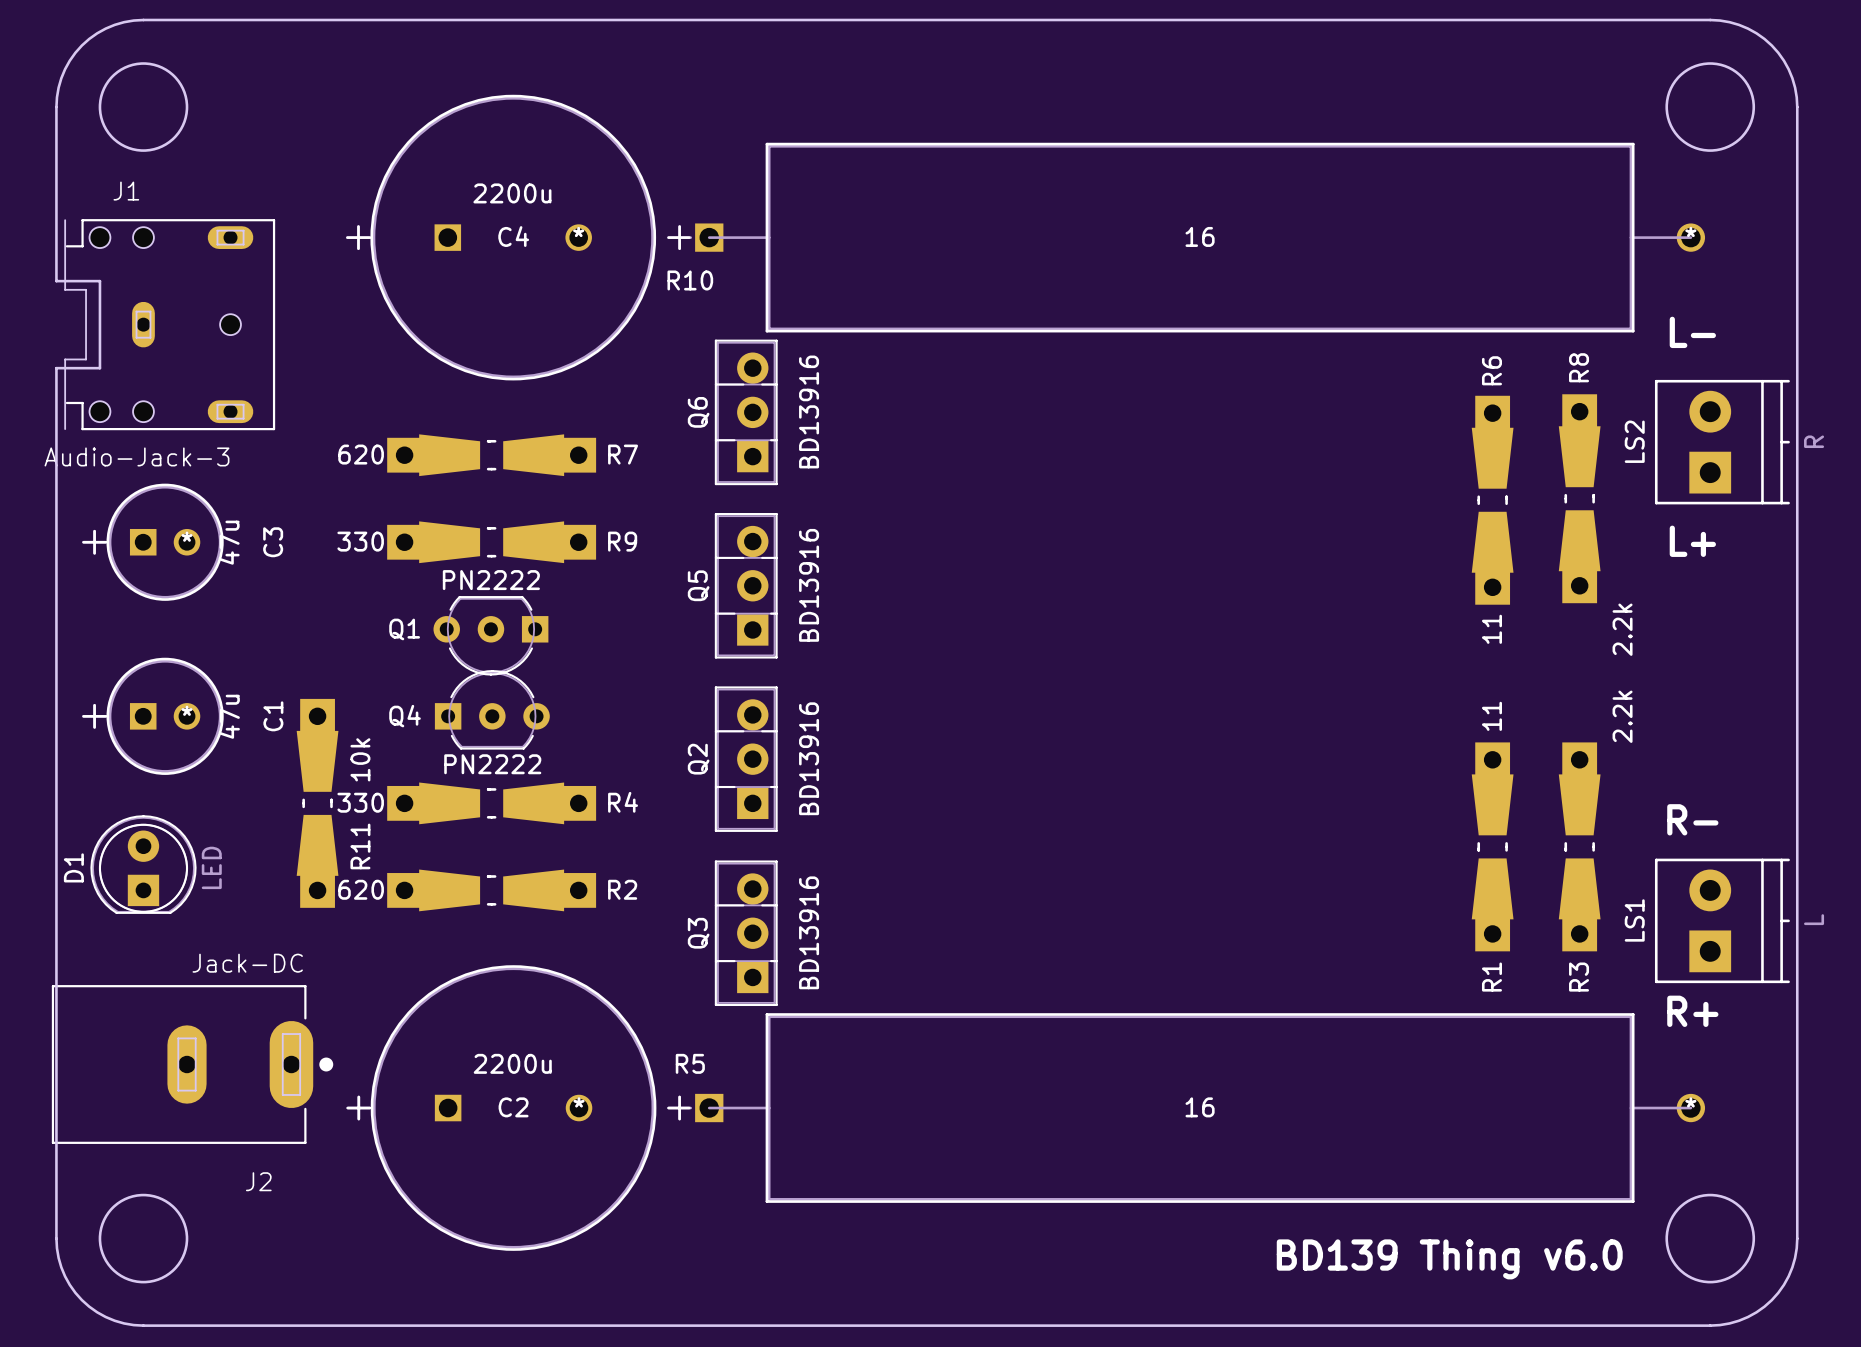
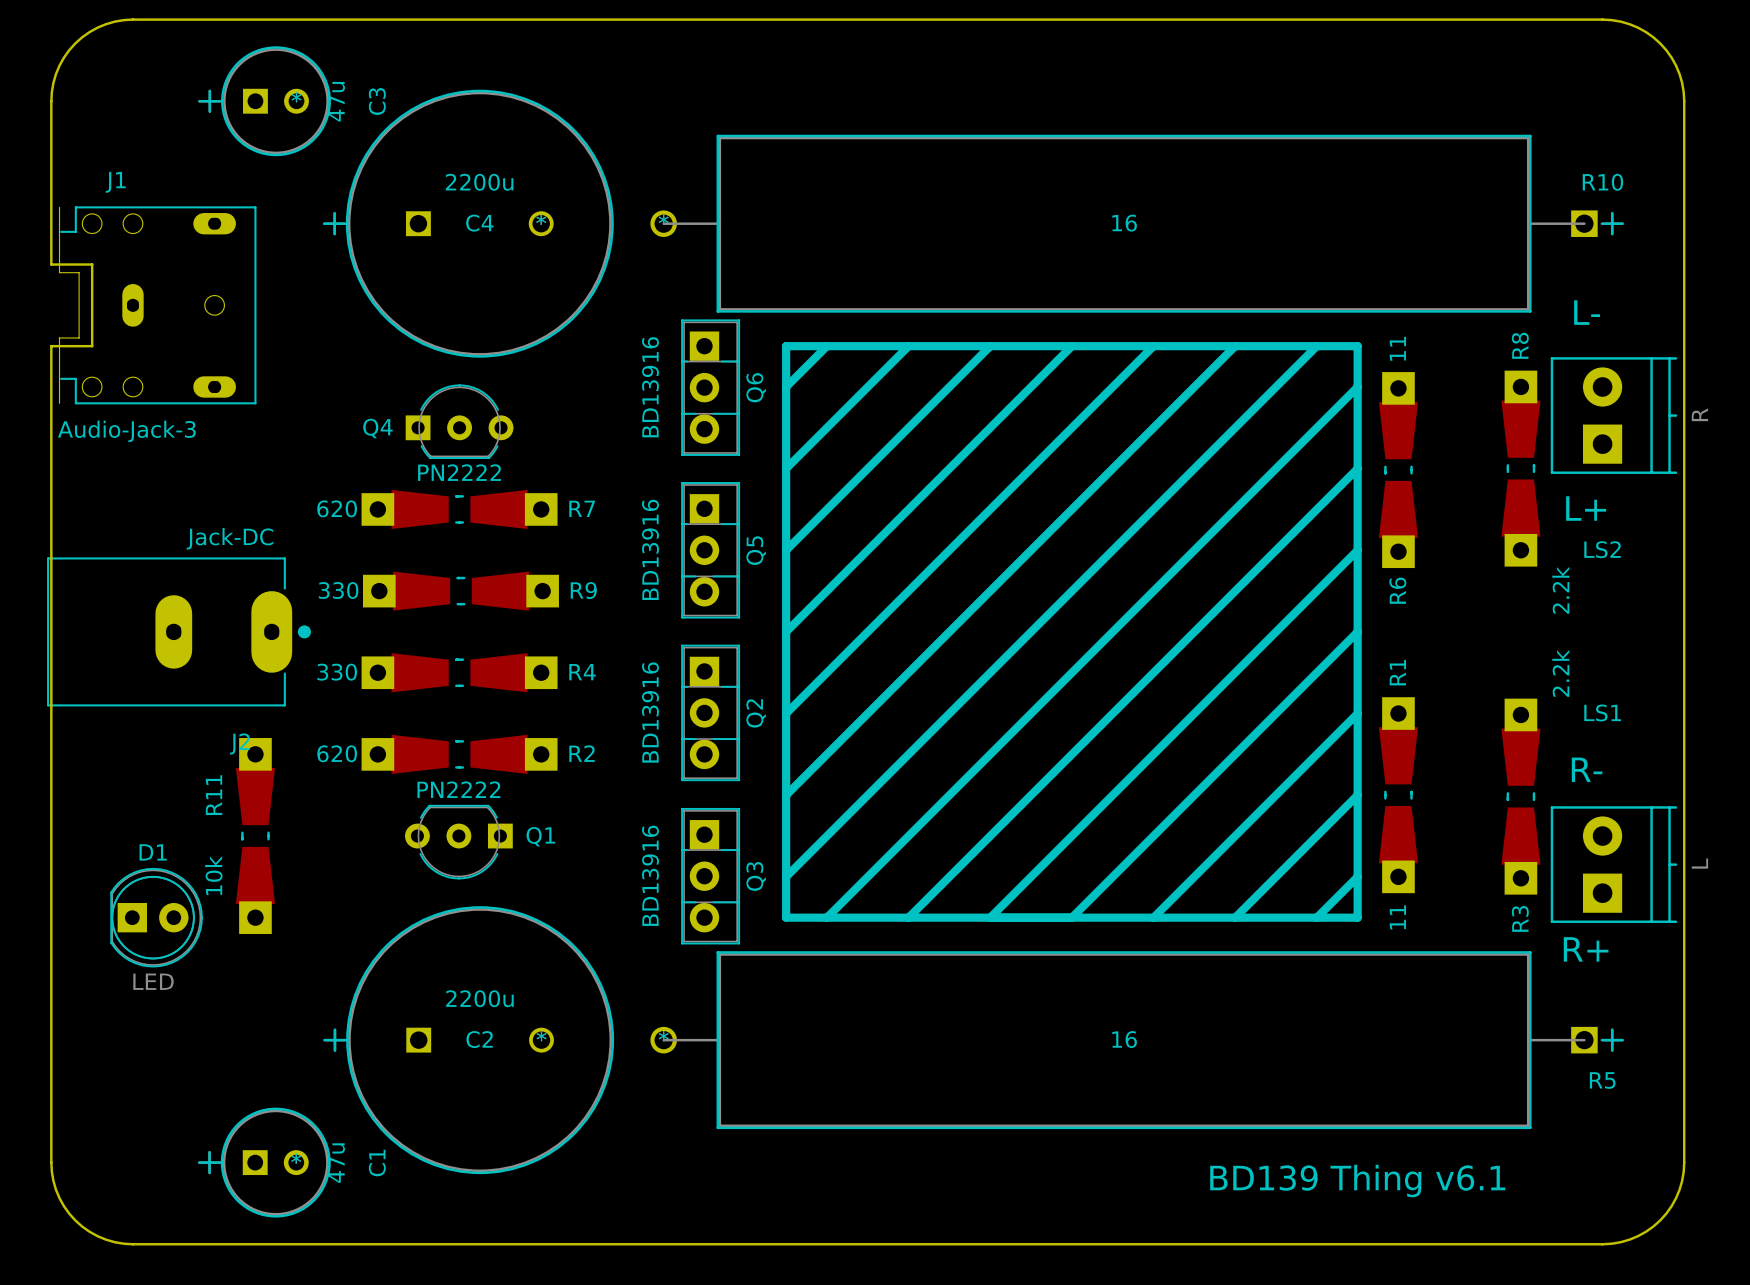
round board edge: [98, 62, 189, 152] -> none
round board edge: [1665, 62, 1756, 152] -> none
R10 rotation: 0° (1186, 237) -> 180° (1137, 223)
line: none -> (786, 346) (786, 917) (1357, 917) (1357, 346) (786, 346)
line: none -> (826, 346) (786, 386)
line: none -> (908, 346) (786, 468)
line: none -> (990, 346) (786, 550)
line: none -> (1071, 346) (786, 631)
line: none -> (1153, 346) (786, 713)
line: none -> (1235, 346) (786, 795)
line: none -> (1316, 346) (786, 876)
line: none -> (1357, 386) (826, 917)
Q6 rotation: 0° (746, 412) -> 180° (710, 387)
LS2 name rotation: 0° (1634, 441) -> 90° clockwise (1602, 549)
LS2 name position: LS2 (1634, 441) -> LS2 (1602, 549)
R7: 620 (491, 455) -> none
line: none -> (1357, 468) (908, 917)
R8 position: (1579, 498) -> (1520, 468)
R6 rotation: 0° (1492, 500) -> 180° (1398, 470)
R9 value: 330 (360, 541) -> 620 (337, 508)
R9 name: R9 (622, 541) -> R7 (582, 508)
C3 position: (152, 542) -> (264, 101)
Q5 rotation: 0° (746, 585) -> 180° (710, 550)
line: none -> (1357, 550) (990, 917)
Q1 name position: Q1 (404, 629) -> Q1 (540, 836)
R9: none -> 330 (460, 591)
Q4 rotation: 0° (490, 635) -> 180° (459, 421)
Q4 position: (490, 635) -> (459, 421)
line: none -> (1357, 631) (1071, 917)
Q1 rotation: 0° (492, 709) -> 180° (458, 842)
Q1 position: (492, 709) -> (458, 842)
C1 position: (152, 716) -> (264, 1162)
Q4 name position: Q4 (405, 716) -> Q4 (377, 428)
R4: none -> 330 (459, 672)
Q2 rotation: 0° (746, 759) -> 180° (710, 712)
line: none -> (1357, 713) (1153, 917)
R4 value: 330 (360, 802) -> 620 (337, 753)
R4 name: R4 (623, 802) -> R2 (582, 753)
R11 rotation: 0° (317, 803) -> 180° (255, 836)
line: none -> (1357, 795) (1235, 917)
R1 rotation: 0° (1492, 846) -> 180° (1398, 795)
R3 position: (1579, 846) -> (1520, 796)
D1 rotation: 0° (143, 864) -> 90° clockwise (156, 917)
D1 position: (143, 864) -> (156, 917)
R2: 620 (491, 890) -> none
LS1 name rotation: 0° (1634, 920) -> 90° clockwise (1602, 712)
LS1 name position: LS1 (1634, 920) -> LS1 (1602, 712)
Q3 rotation: 0° (746, 933) -> 180° (710, 876)
line: none -> (1357, 876) (1316, 917)
J2 position: (192, 1064) -> (179, 631)
R5 rotation: 0° (1186, 1108) -> 180° (1137, 1040)
round board edge: [98, 1193, 189, 1284] -> none
round board edge: [1665, 1193, 1756, 1284] -> none
text: BD139 Thing v6.0 (1449, 1259) -> BD139 Thing v6.1 (1357, 1181)

